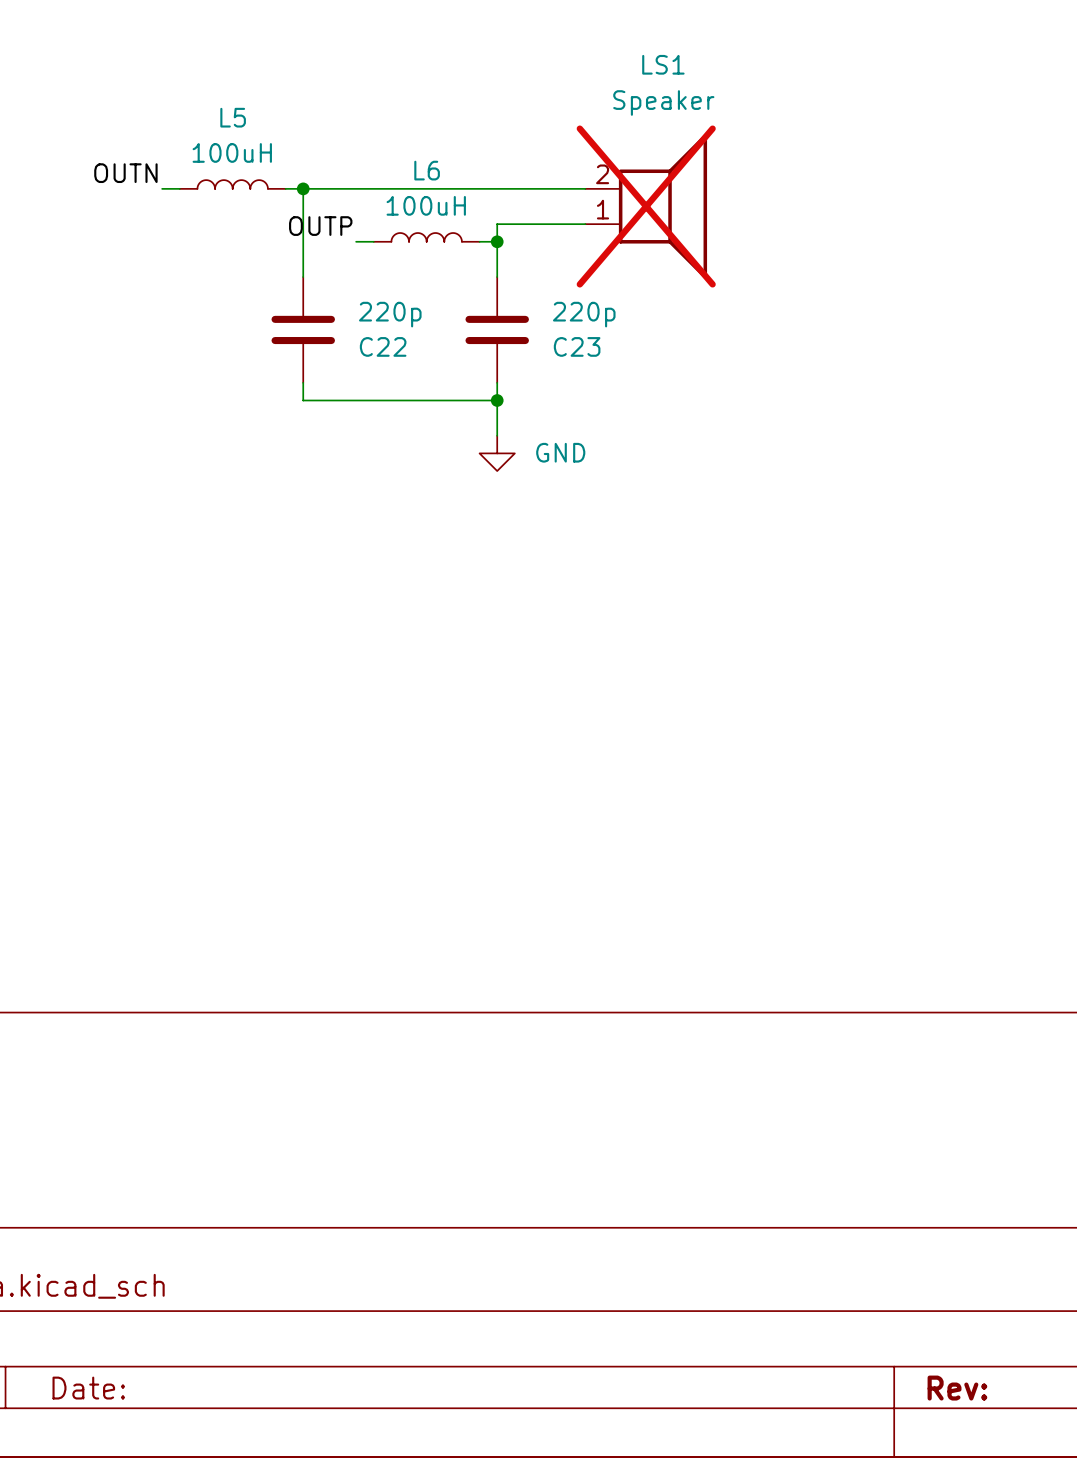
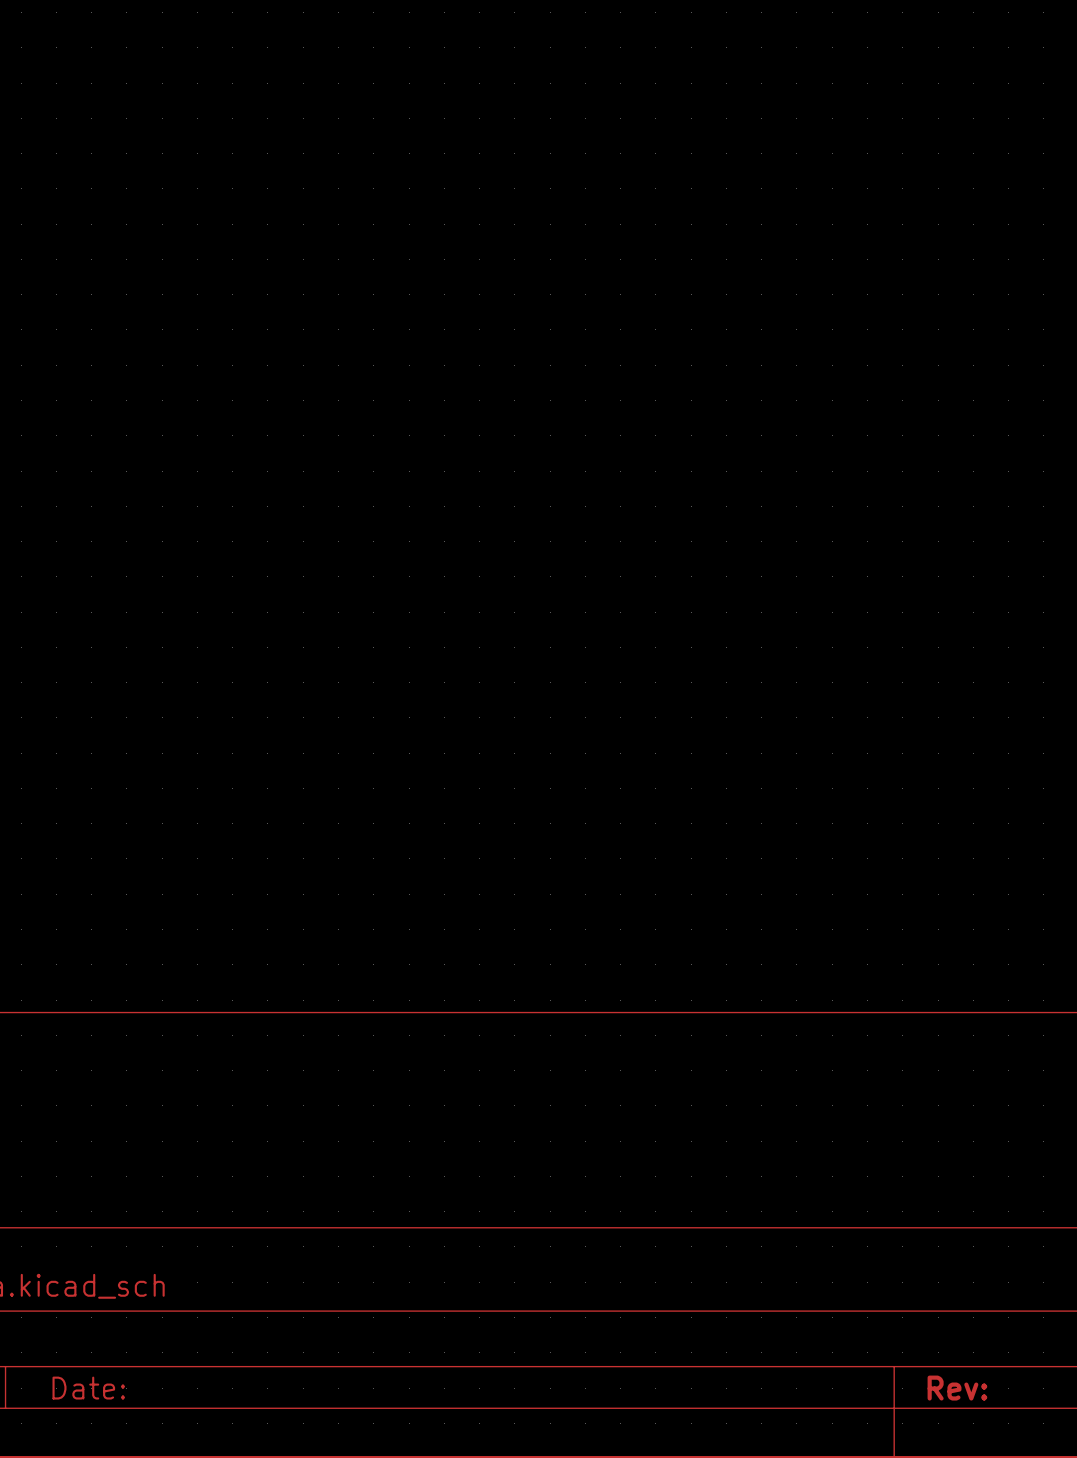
label: OUTN (125, 173) -> none
L5: 100uH (232, 184) -> none
wire: (162, 188) (179, 188) -> none
wire: (285, 188) (585, 188) -> none
wire: (303, 188) (303, 277) -> none
junction: (303, 188) -> none
LS1: Speaker (646, 206) -> none
wire: (585, 224) (497, 224) (497, 277) -> none
label: OUTP (320, 226) -> none
L6: 100uH (426, 237) -> none
wire: (356, 241) (373, 241) -> none
wire: (479, 241) (497, 241) -> none
junction: (497, 241) -> none
C22: 220p (303, 329) -> none
C23: 220p (497, 329) -> none
wire: (303, 382) (303, 400) (497, 400) -> none
wire: (497, 382) (497, 435) -> none
junction: (497, 400) -> none
power symbol: GND (497, 453) -> none

